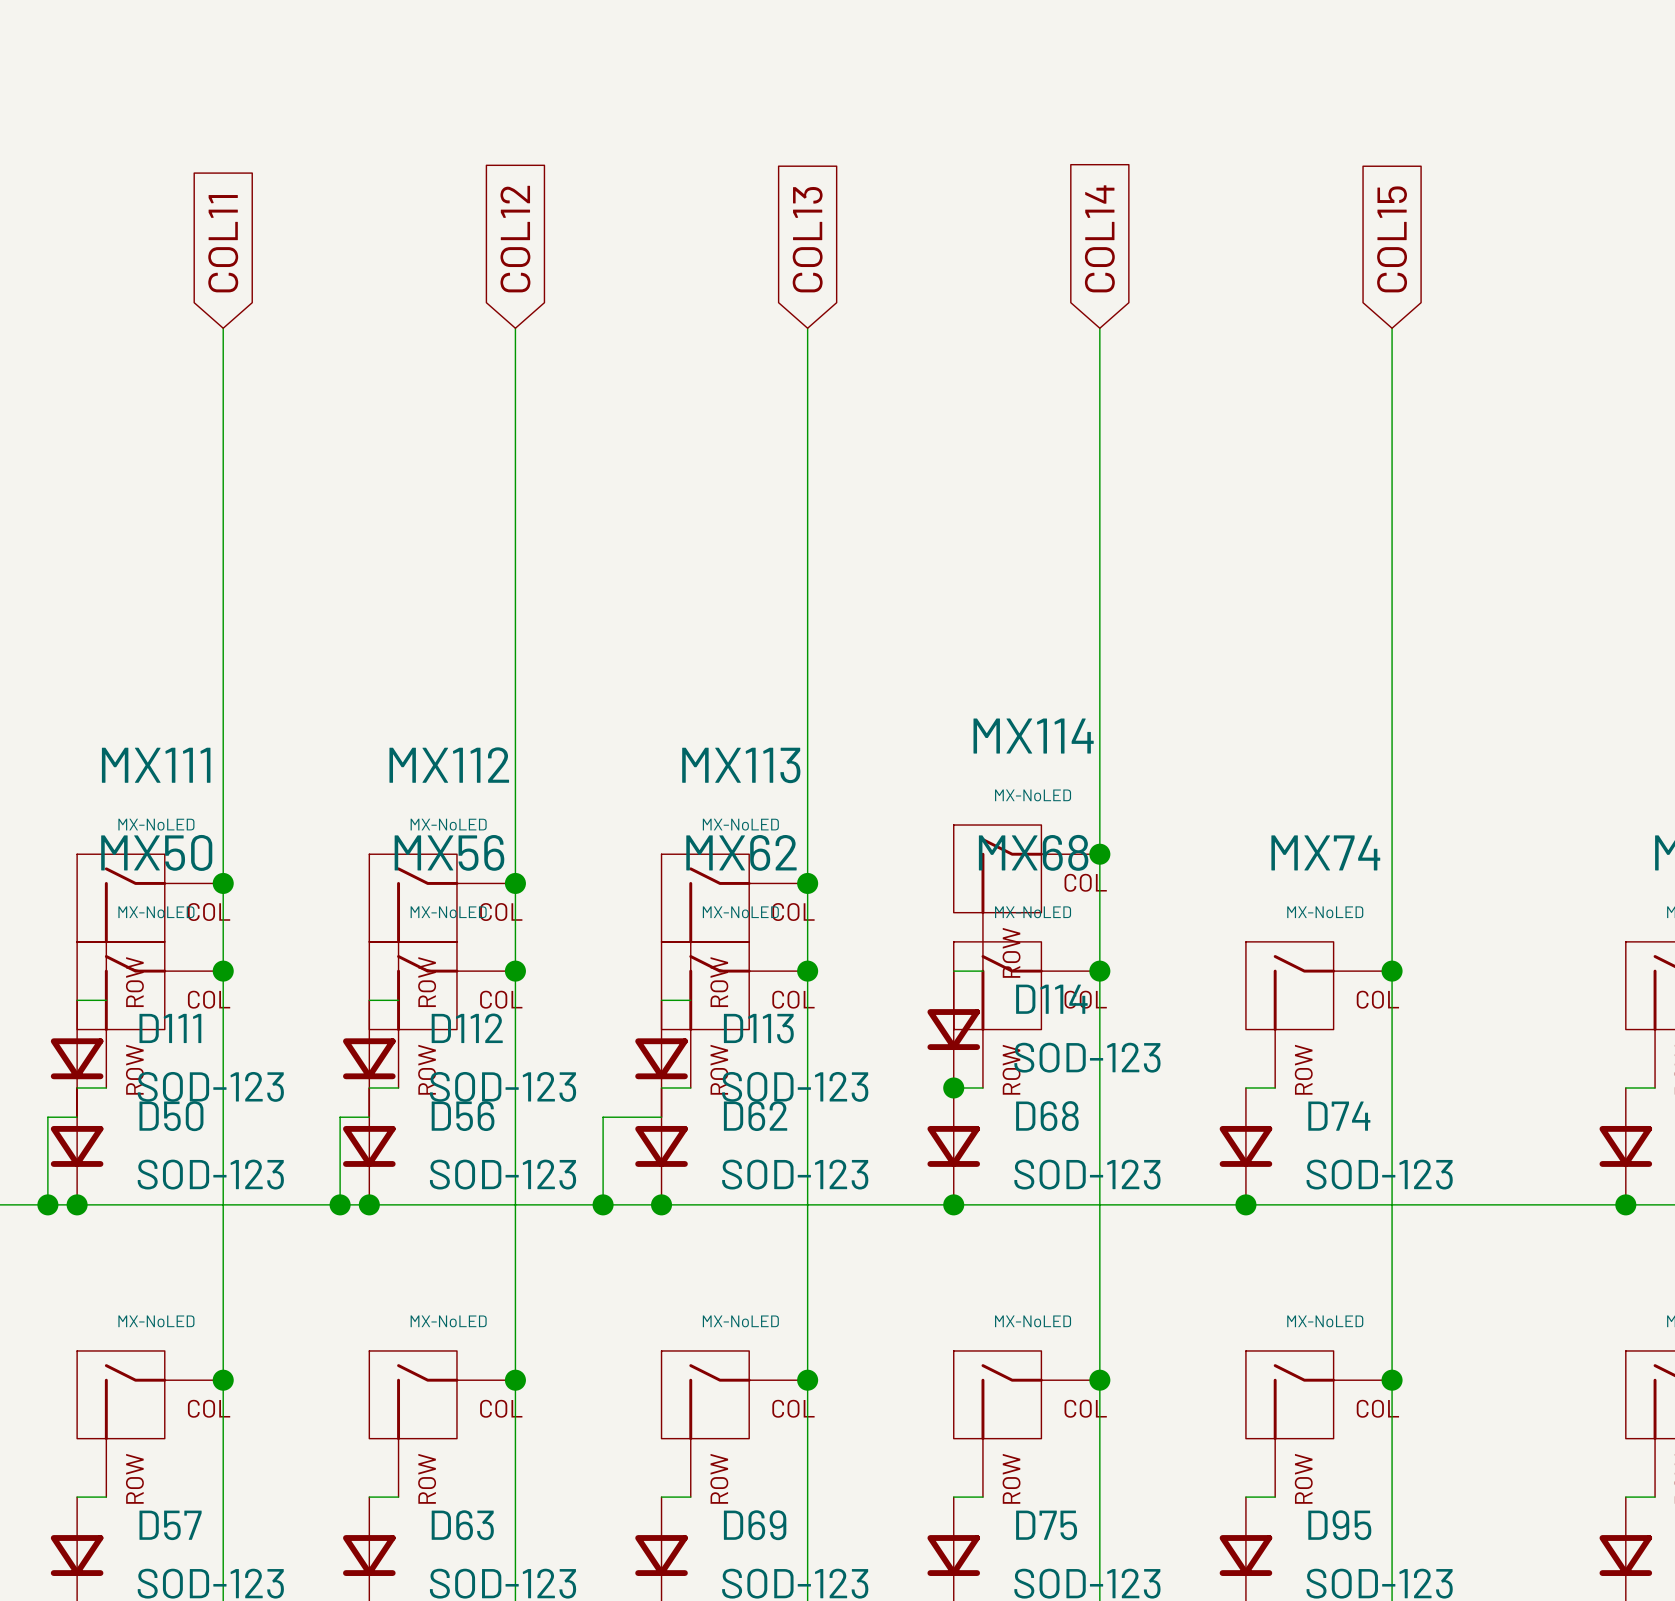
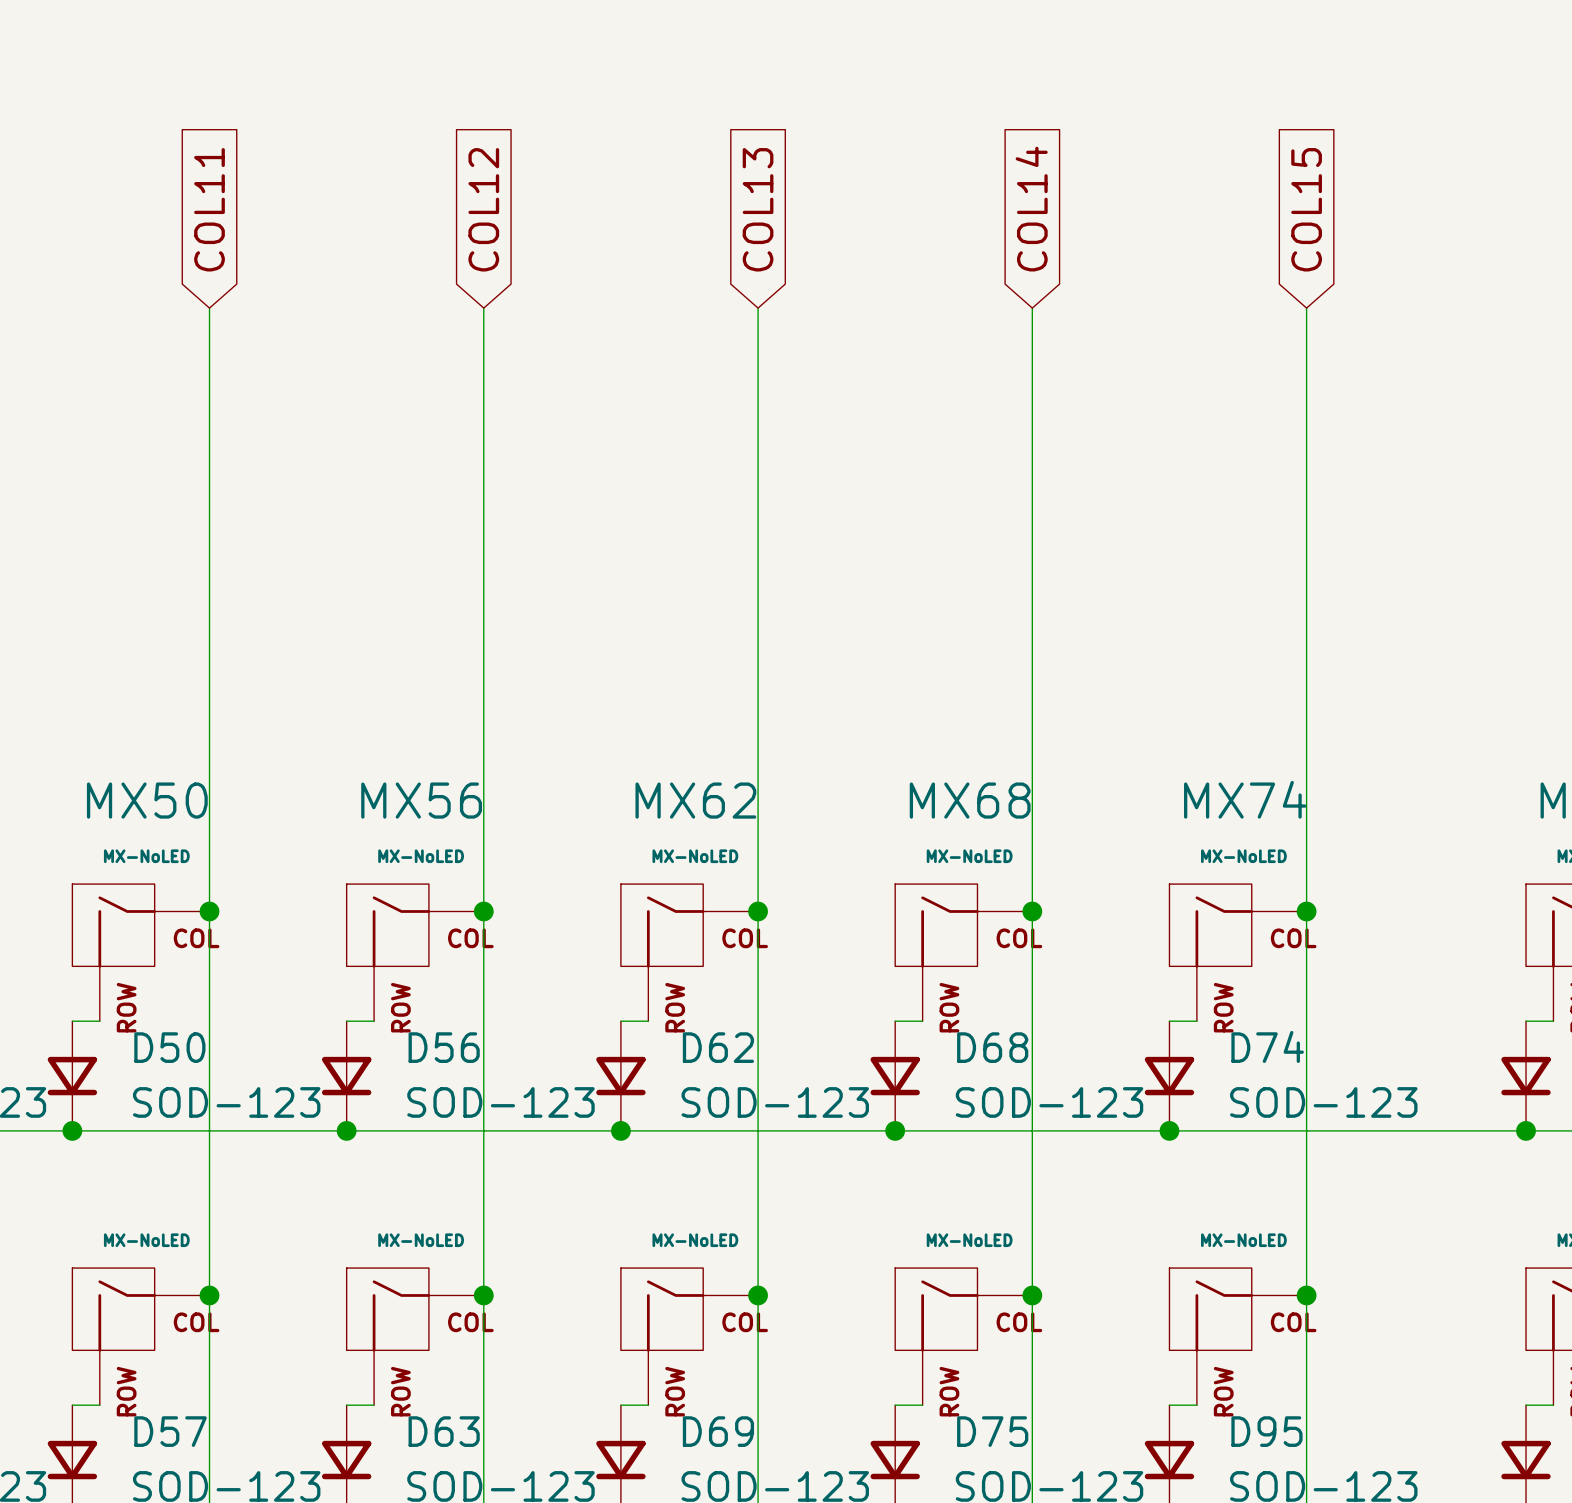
junction: (1099, 854) -> none
junction: (223, 883) -> none
junction: (515, 883) -> none
junction: (807, 883) -> none
MX114: MX-NoLED (1026, 898) -> none
MX111: MX-NoLED (150, 927) -> none
MX112: MX-NoLED (442, 927) -> none
MX113: MX-NoLED (734, 927) -> none
wire: (953, 971) (982, 971) -> none
wire: (77, 1000) (106, 1000) -> none
wire: (369, 1000) (398, 1000) -> none
wire: (661, 1000) (690, 1000) -> none
D114: SOD-123 (953, 1029) -> none
D111: SOD-123 (77, 1058) -> none
D112: SOD-123 (369, 1058) -> none
D113: SOD-123 (661, 1058) -> none
junction: (953, 1087) -> none
wire: (77, 1117) (47, 1117) (47, 1204) -> none
wire: (369, 1117) (340, 1117) (340, 1204) -> none
wire: (661, 1117) (603, 1117) (603, 1204) -> none
junction: (47, 1204) -> none
junction: (340, 1204) -> none
junction: (603, 1204) -> none

